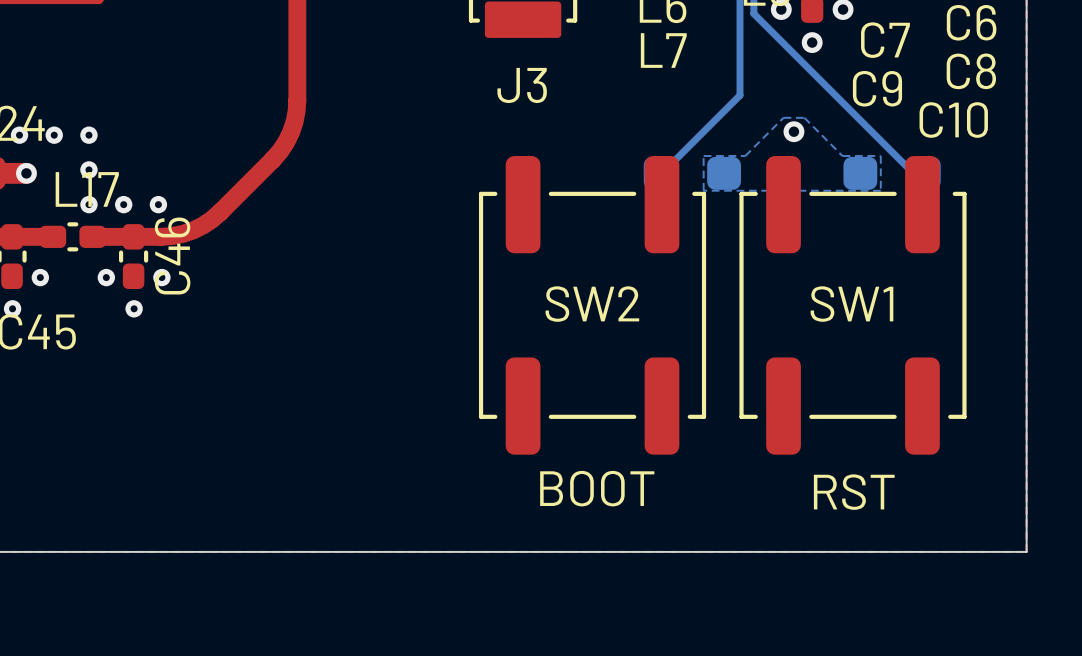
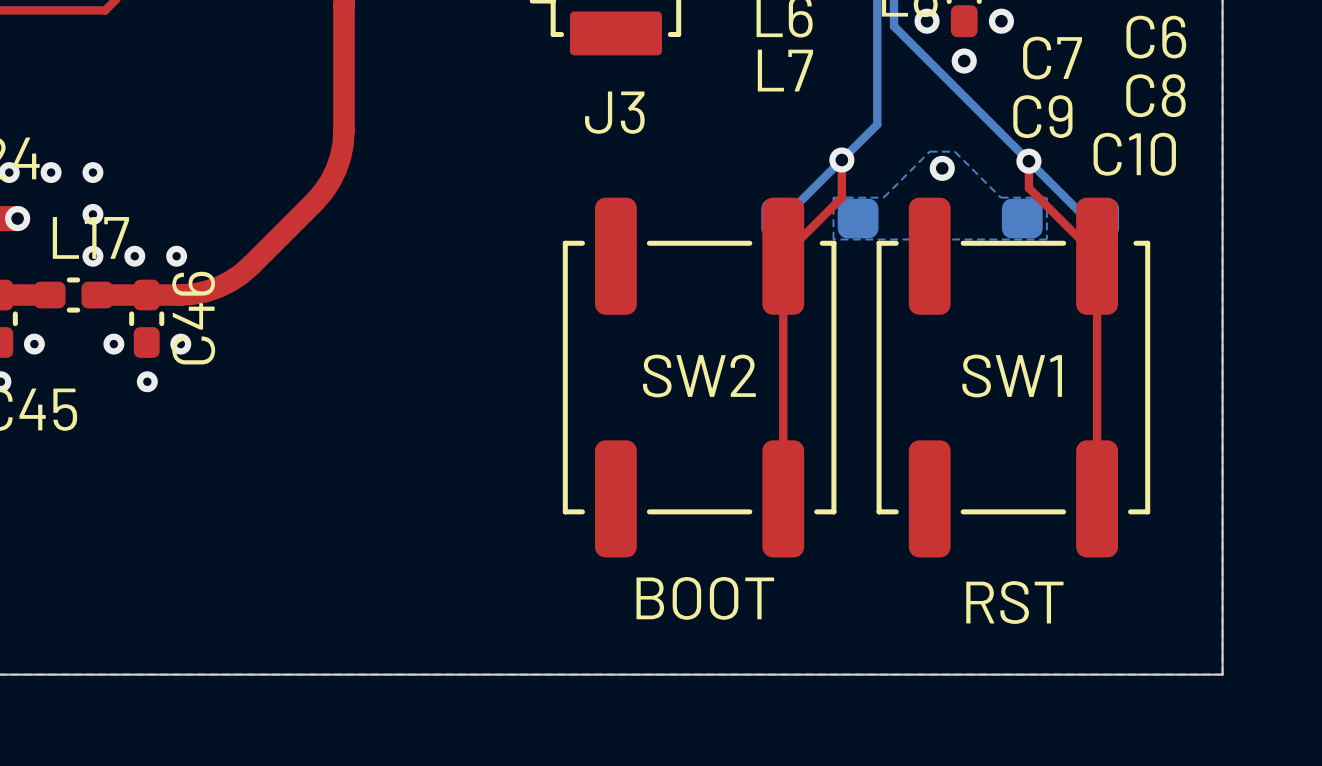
top track: none -> (841, 160) (841, 197) (783, 256) (783, 498)
via: none -> (841, 160)
via: none -> (1028, 161)
top track: none -> (1030, 162) (1028, 161) (1028, 188) (1097, 256) (1097, 498)

